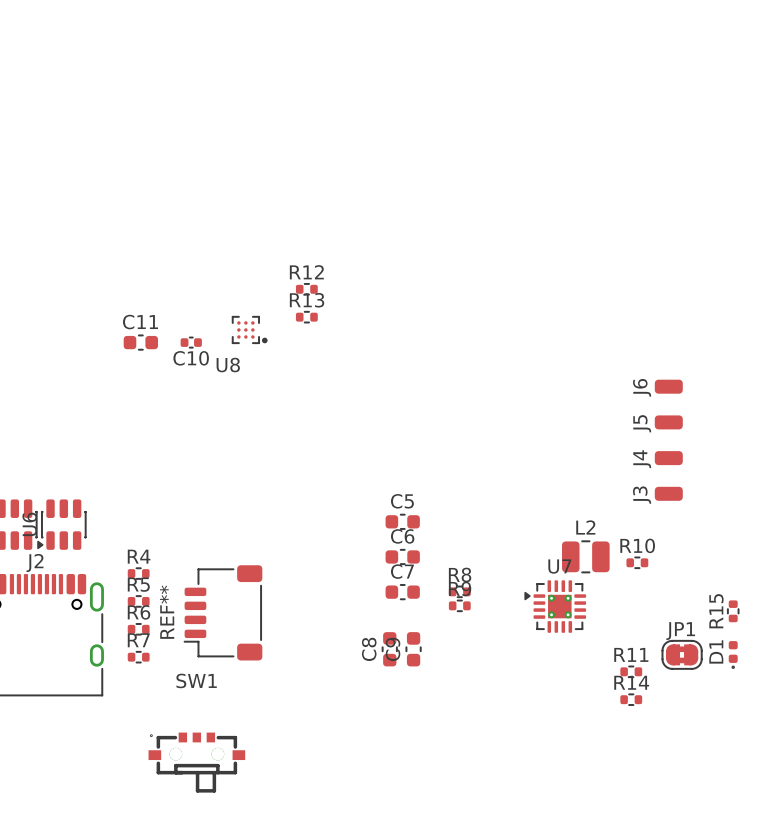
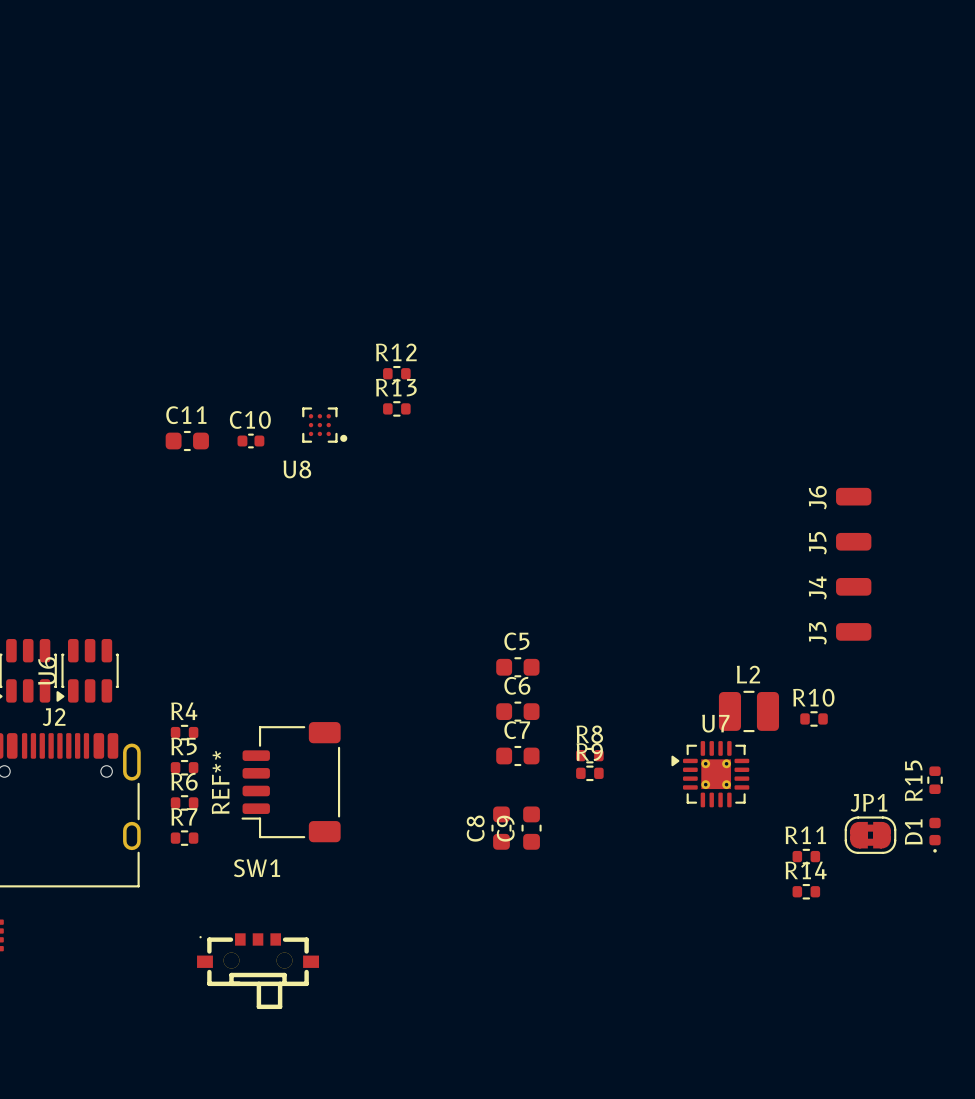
C10 name position: C10 (191, 358) -> C10 (250, 419)

